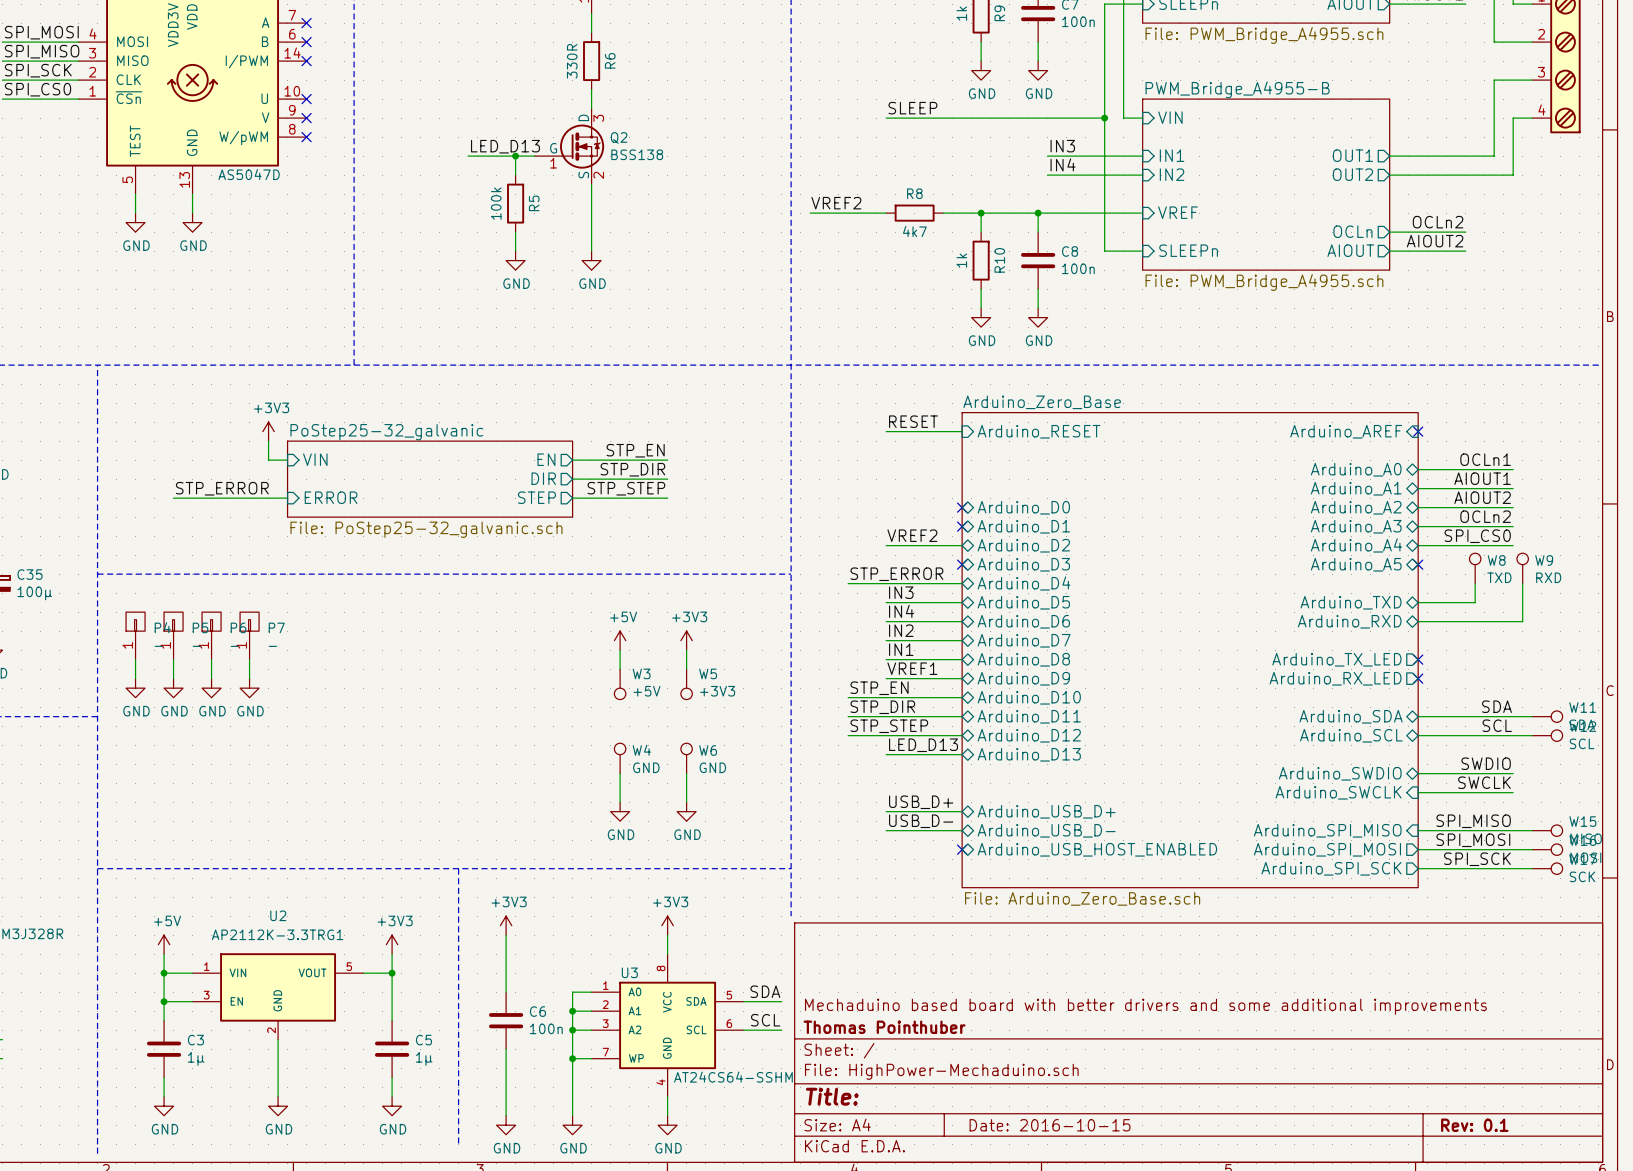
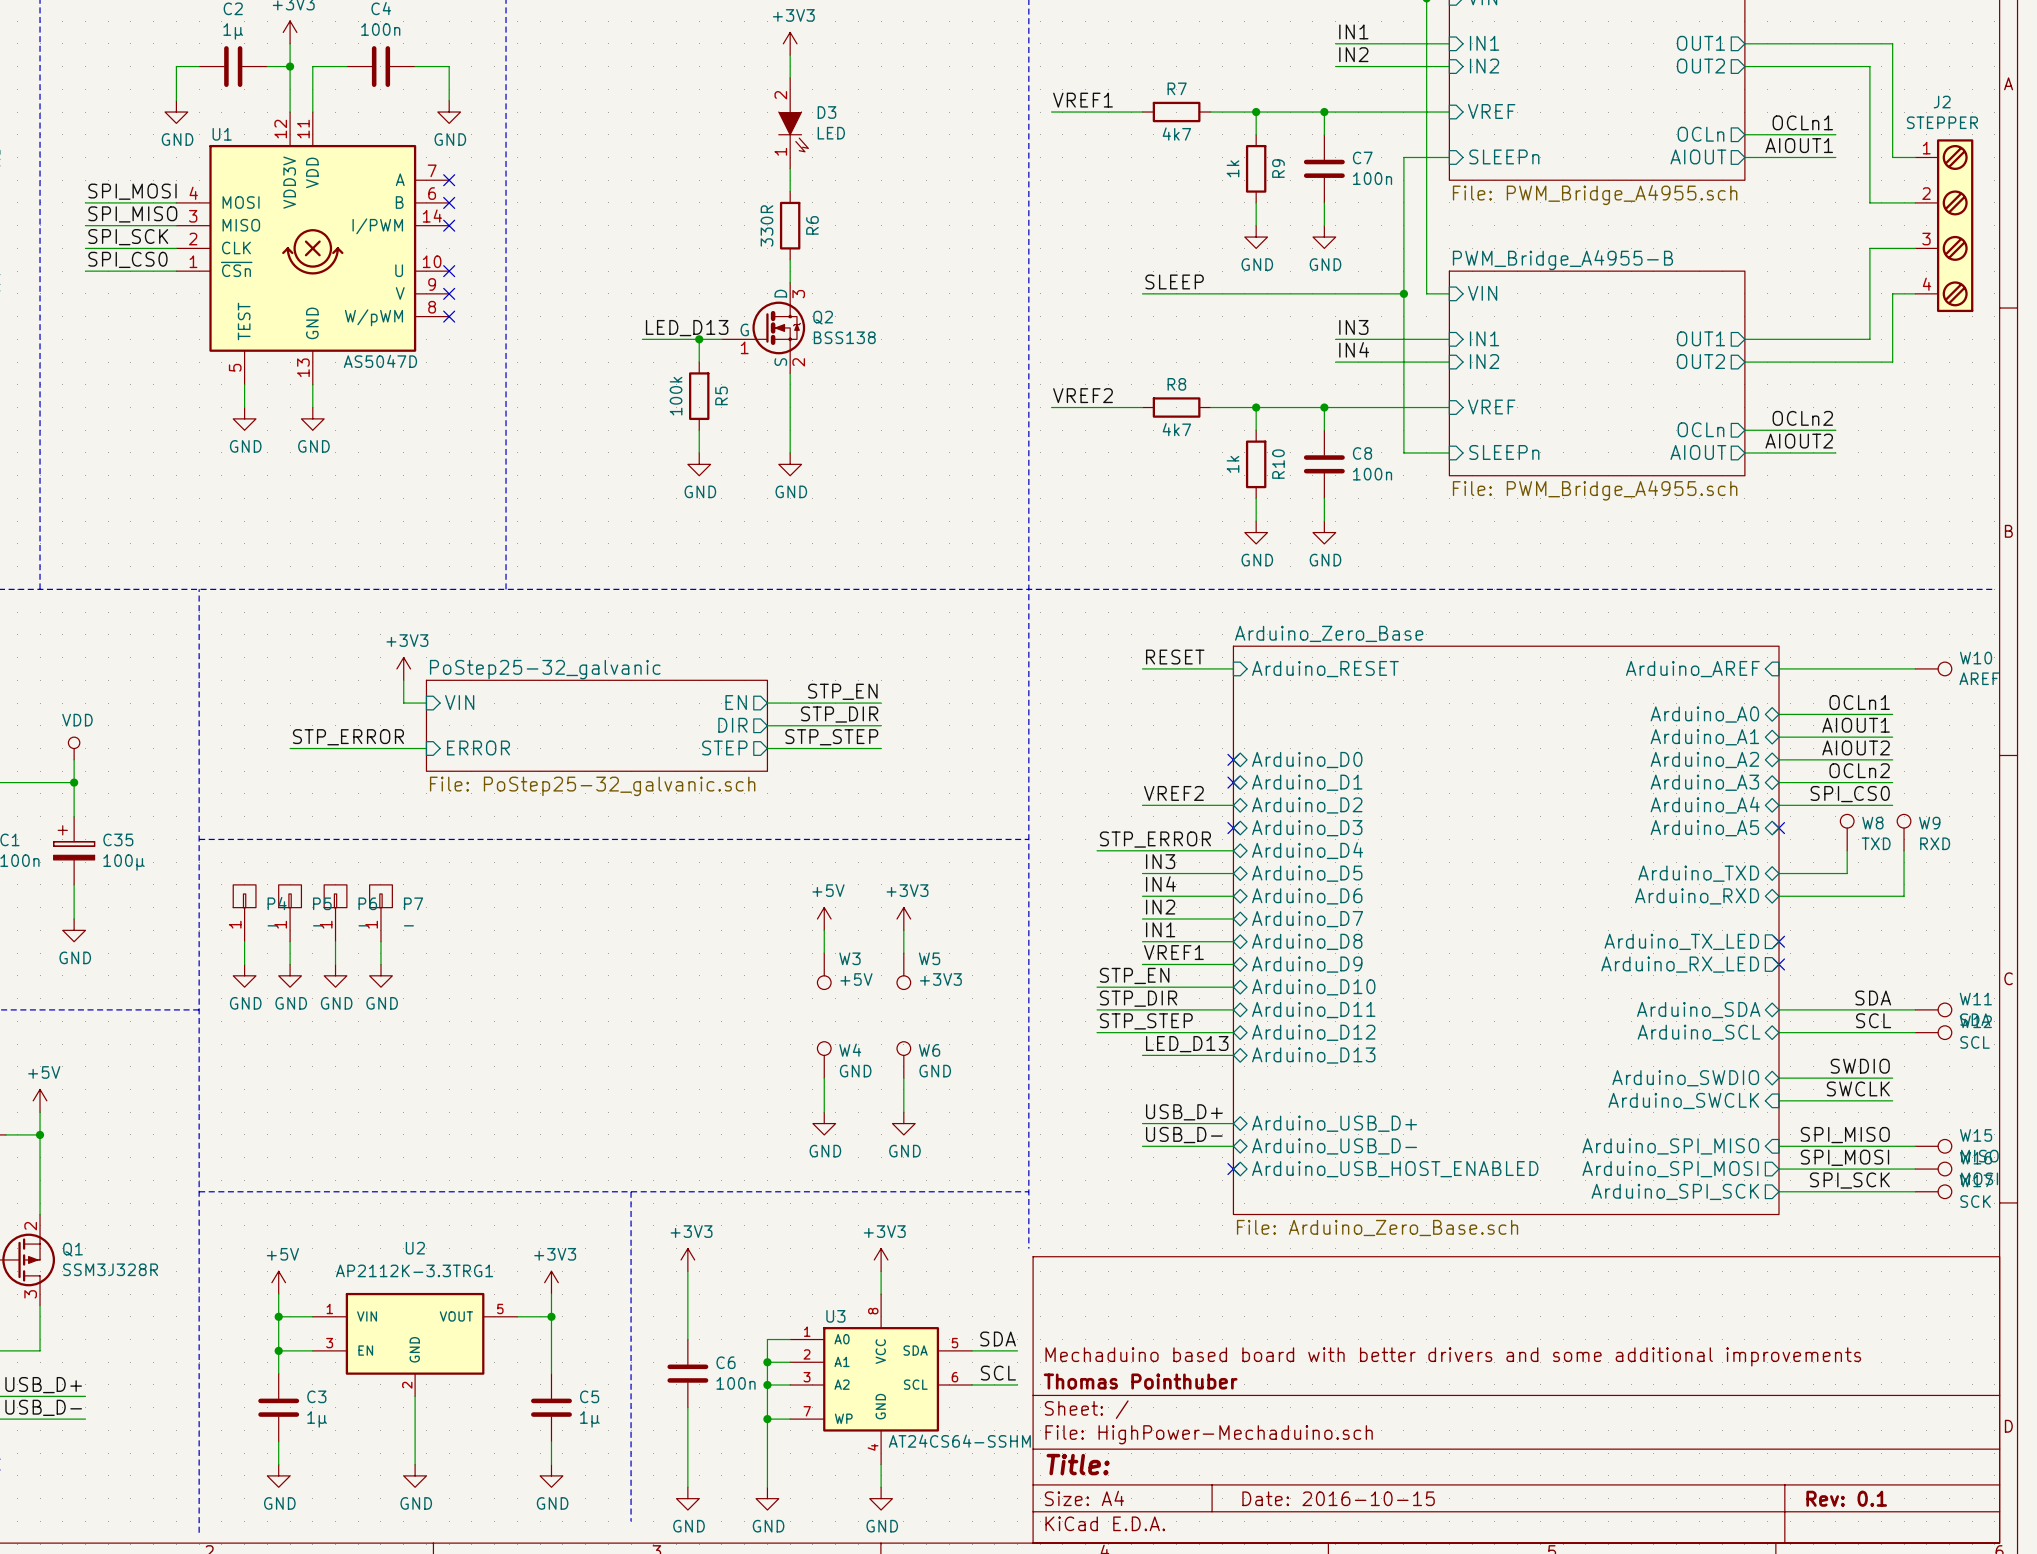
wire: none -> (1778, 668) (1915, 668)
no-connect mark: (1418, 431) -> none
W10: none -> AREF (1933, 668)

